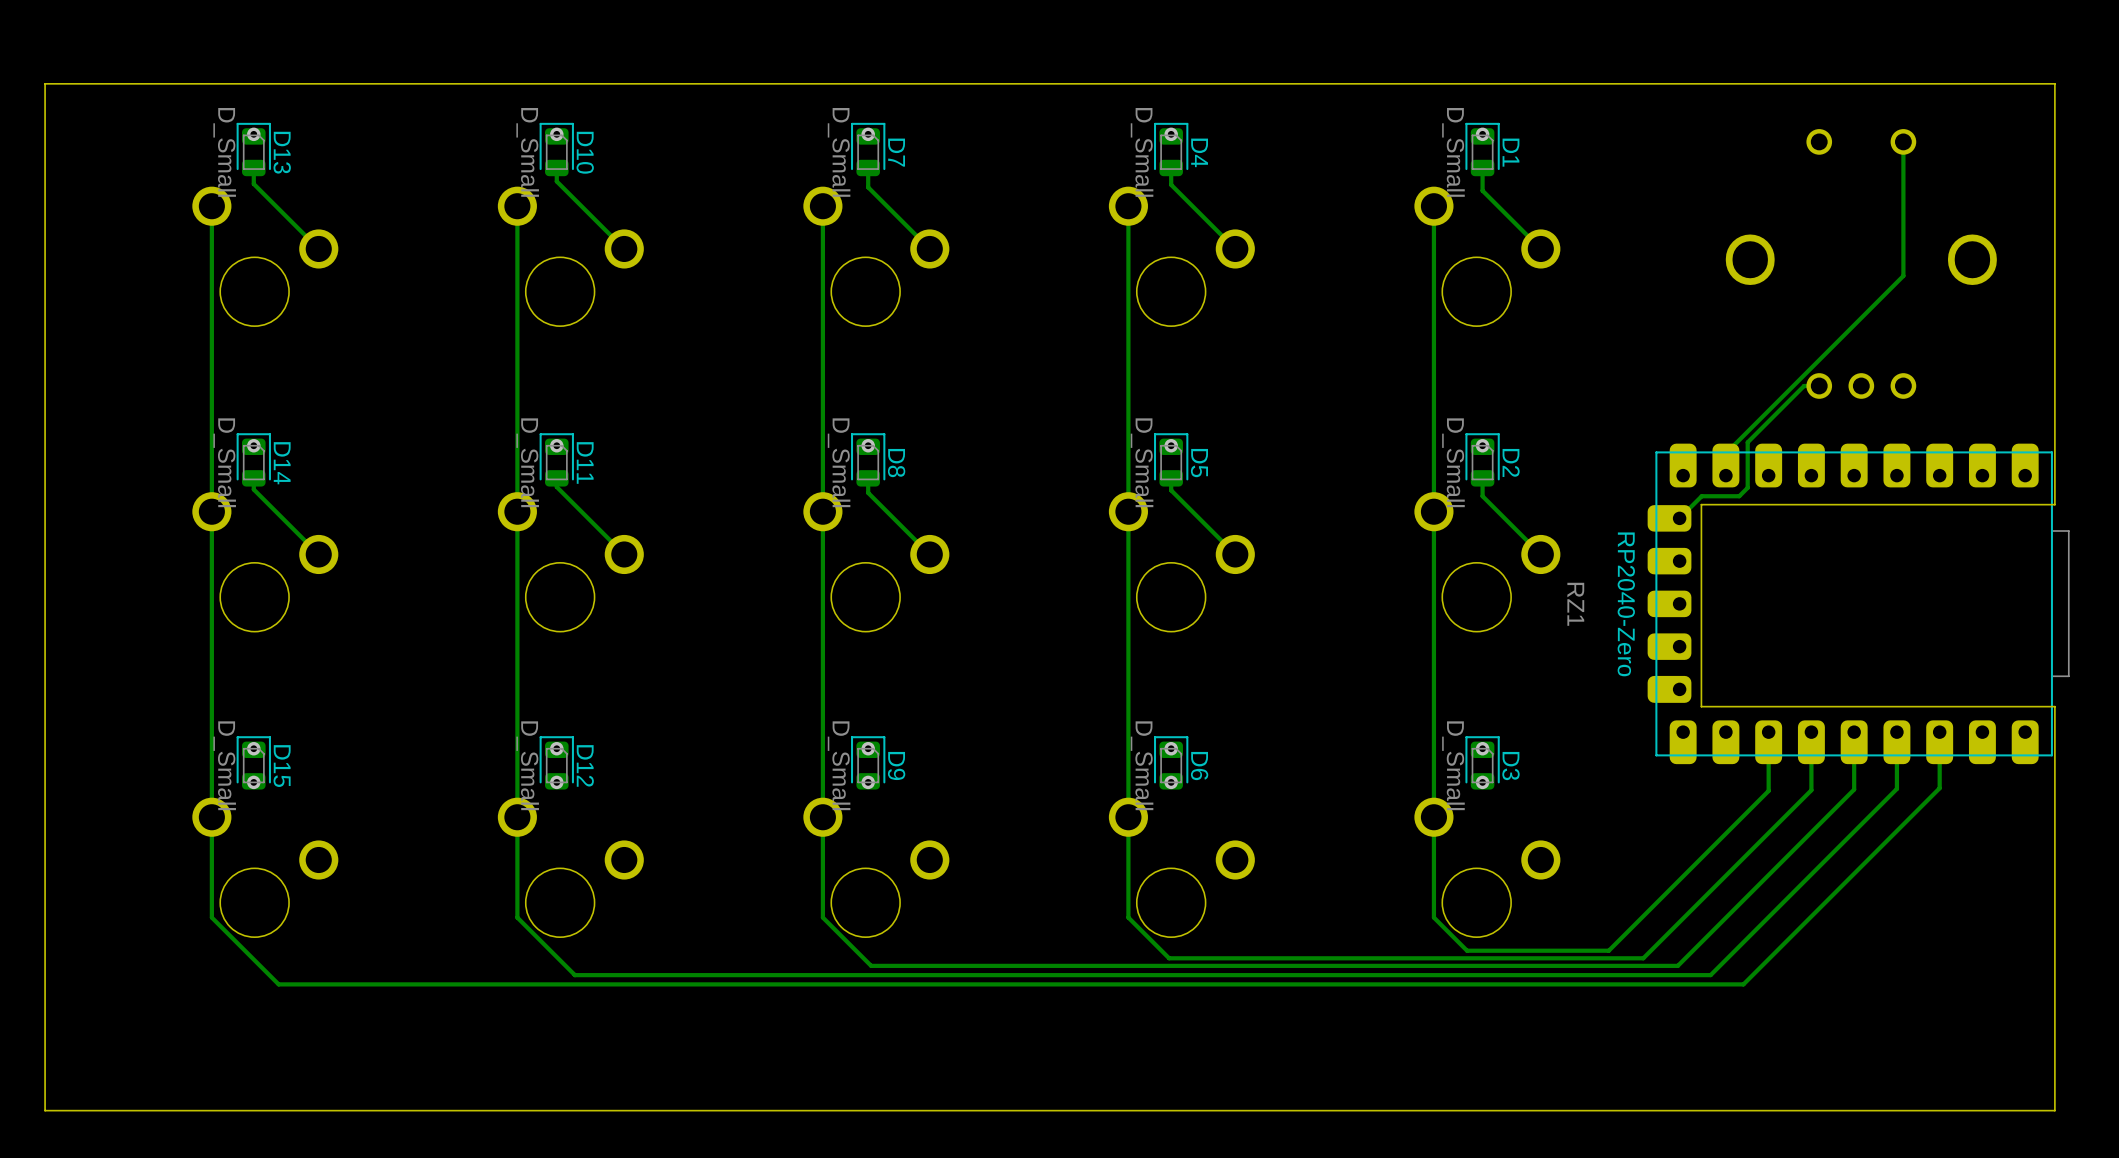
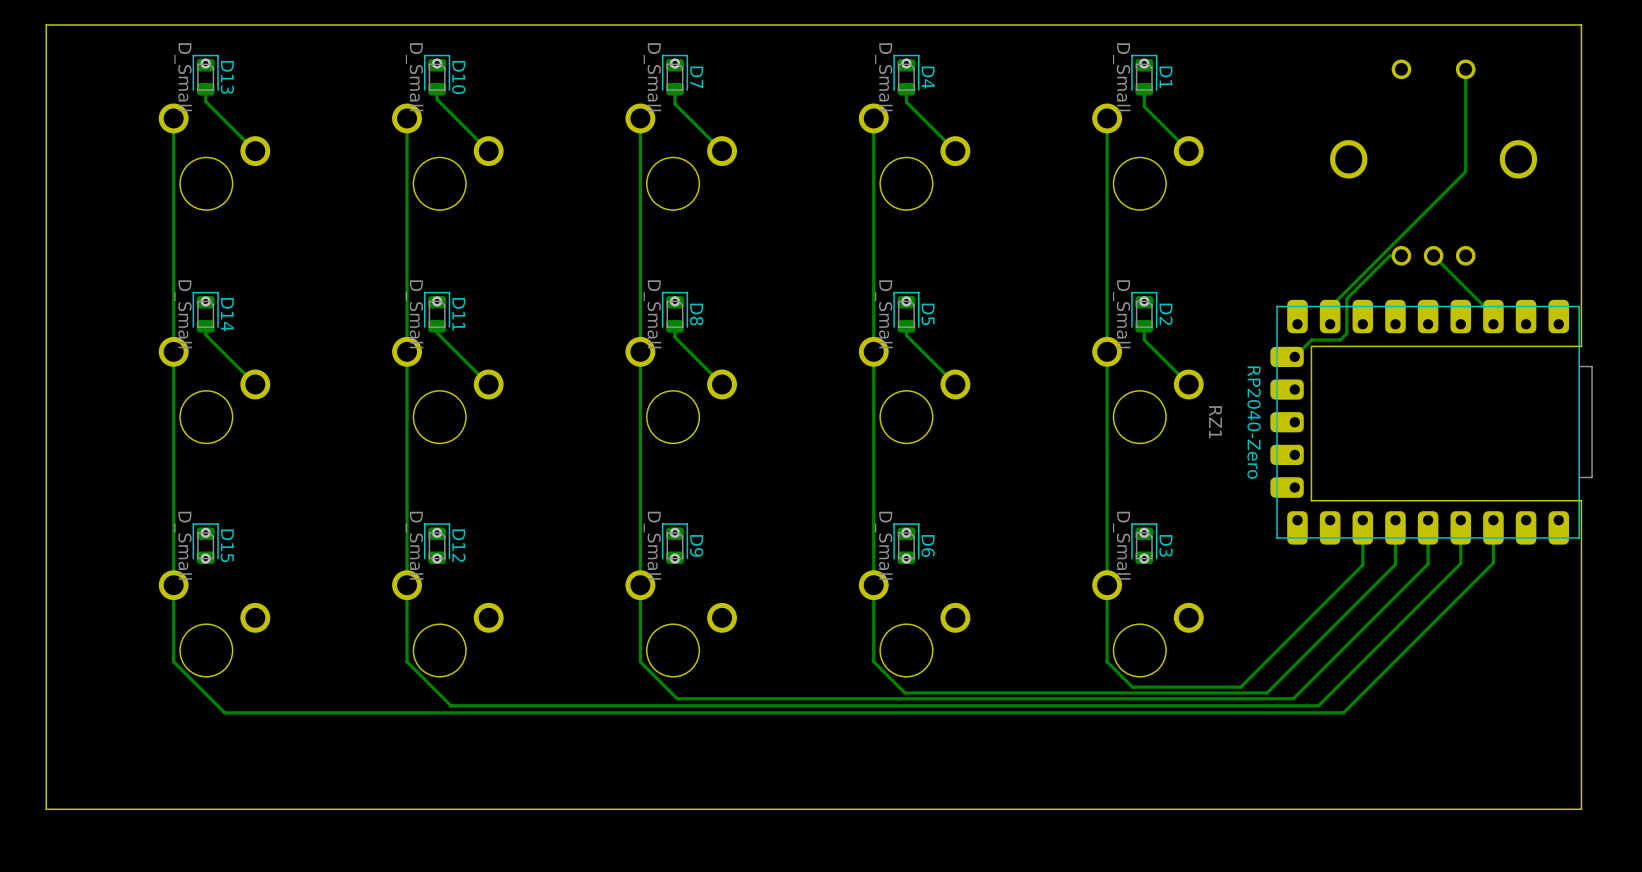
track: none -> (1433, 255) (1493, 315) (1493, 324)

